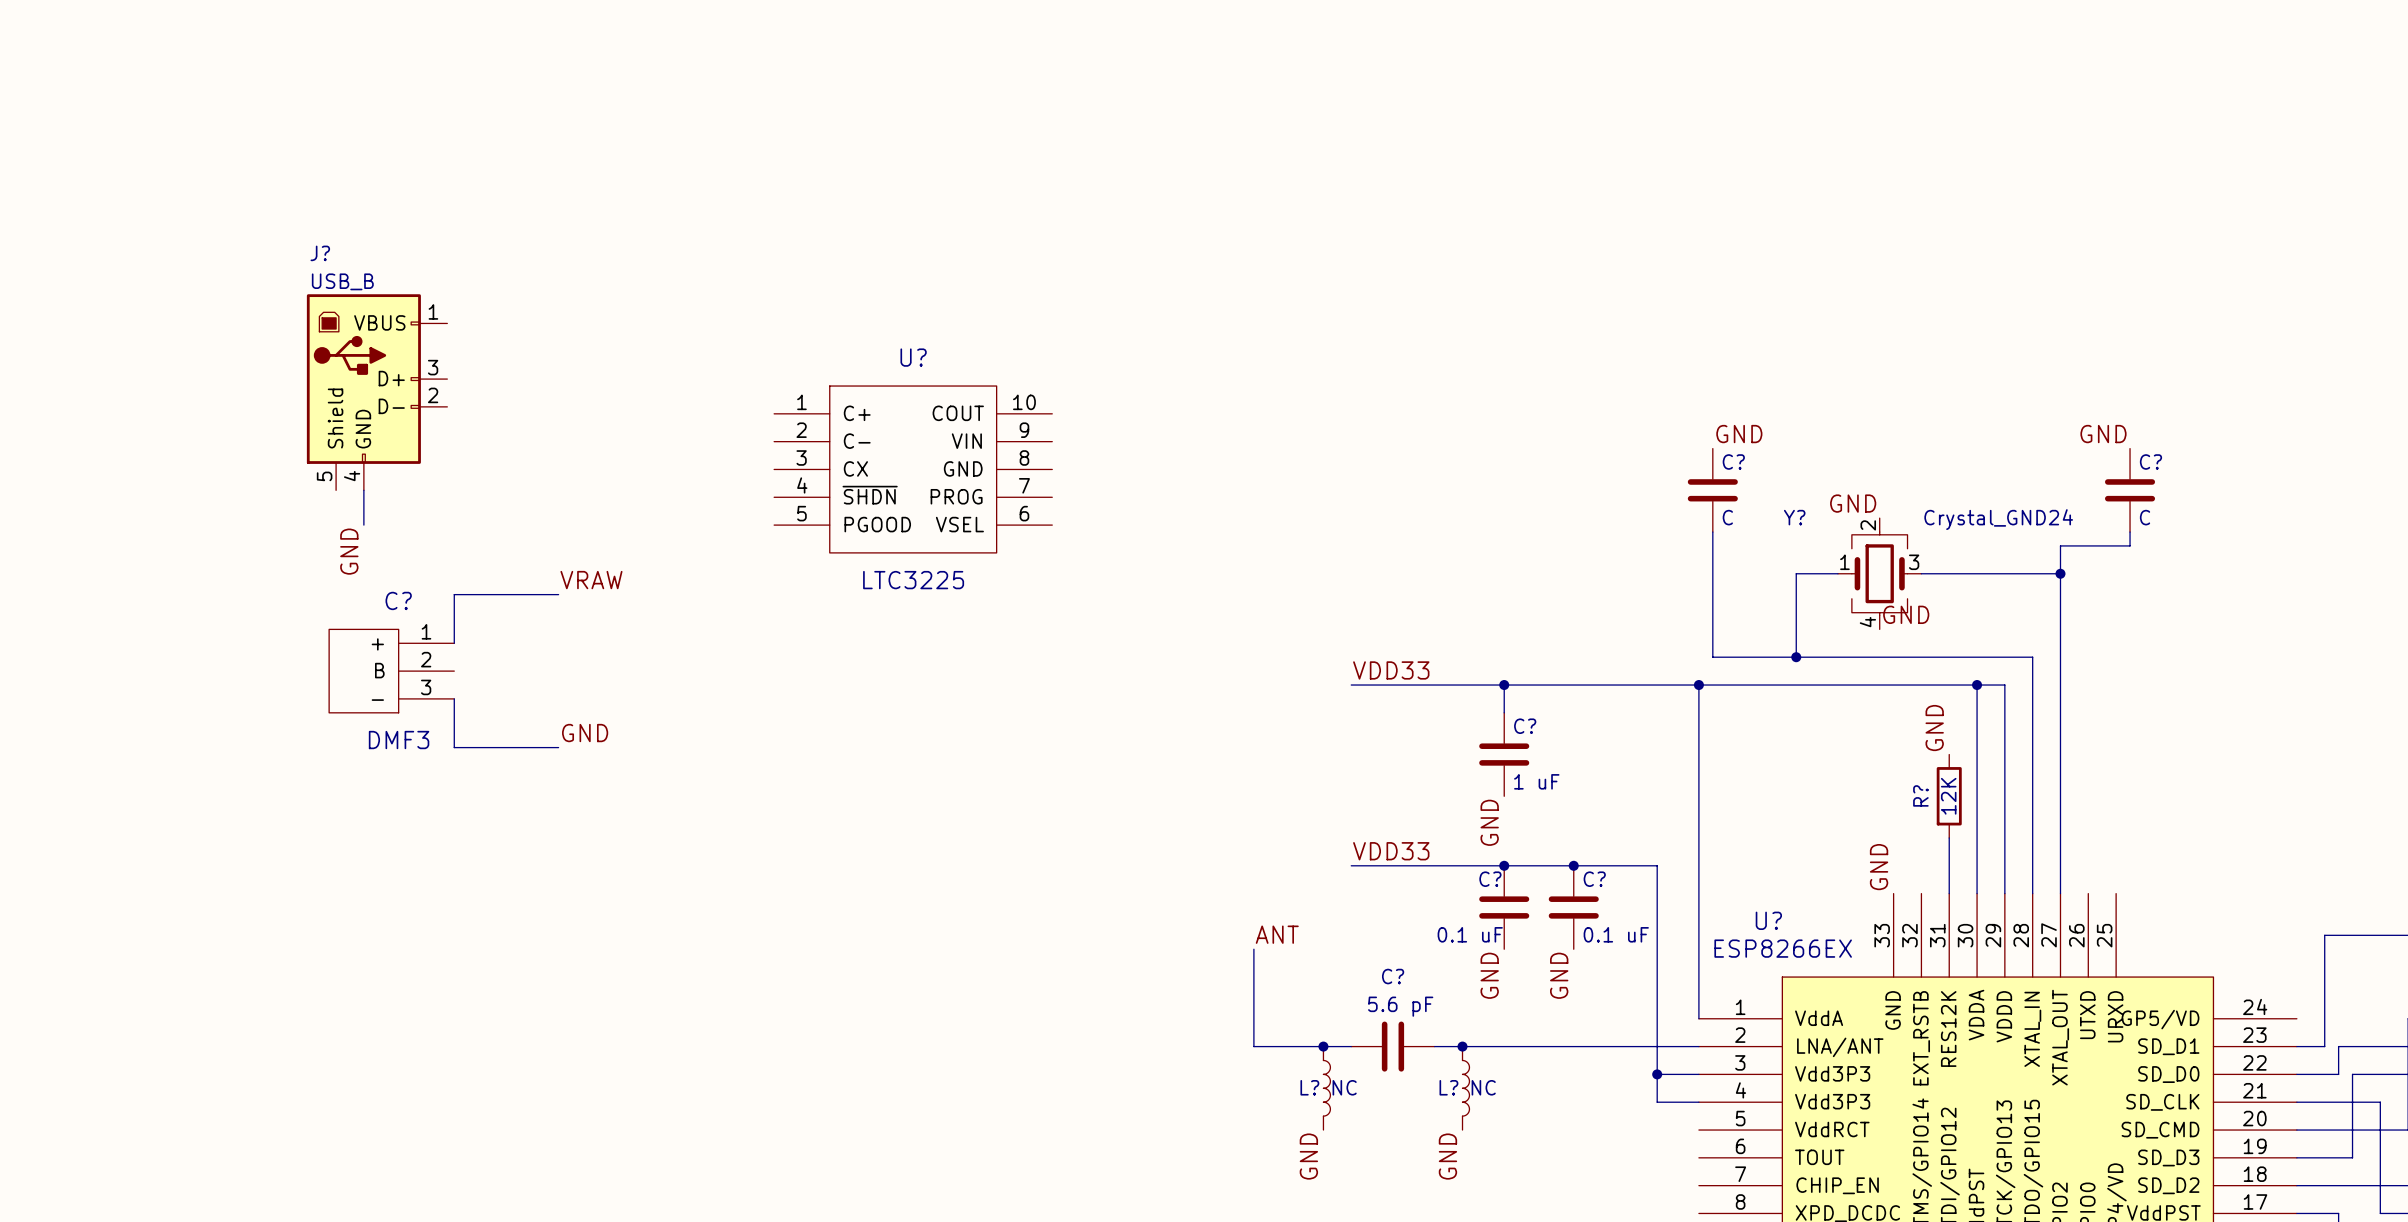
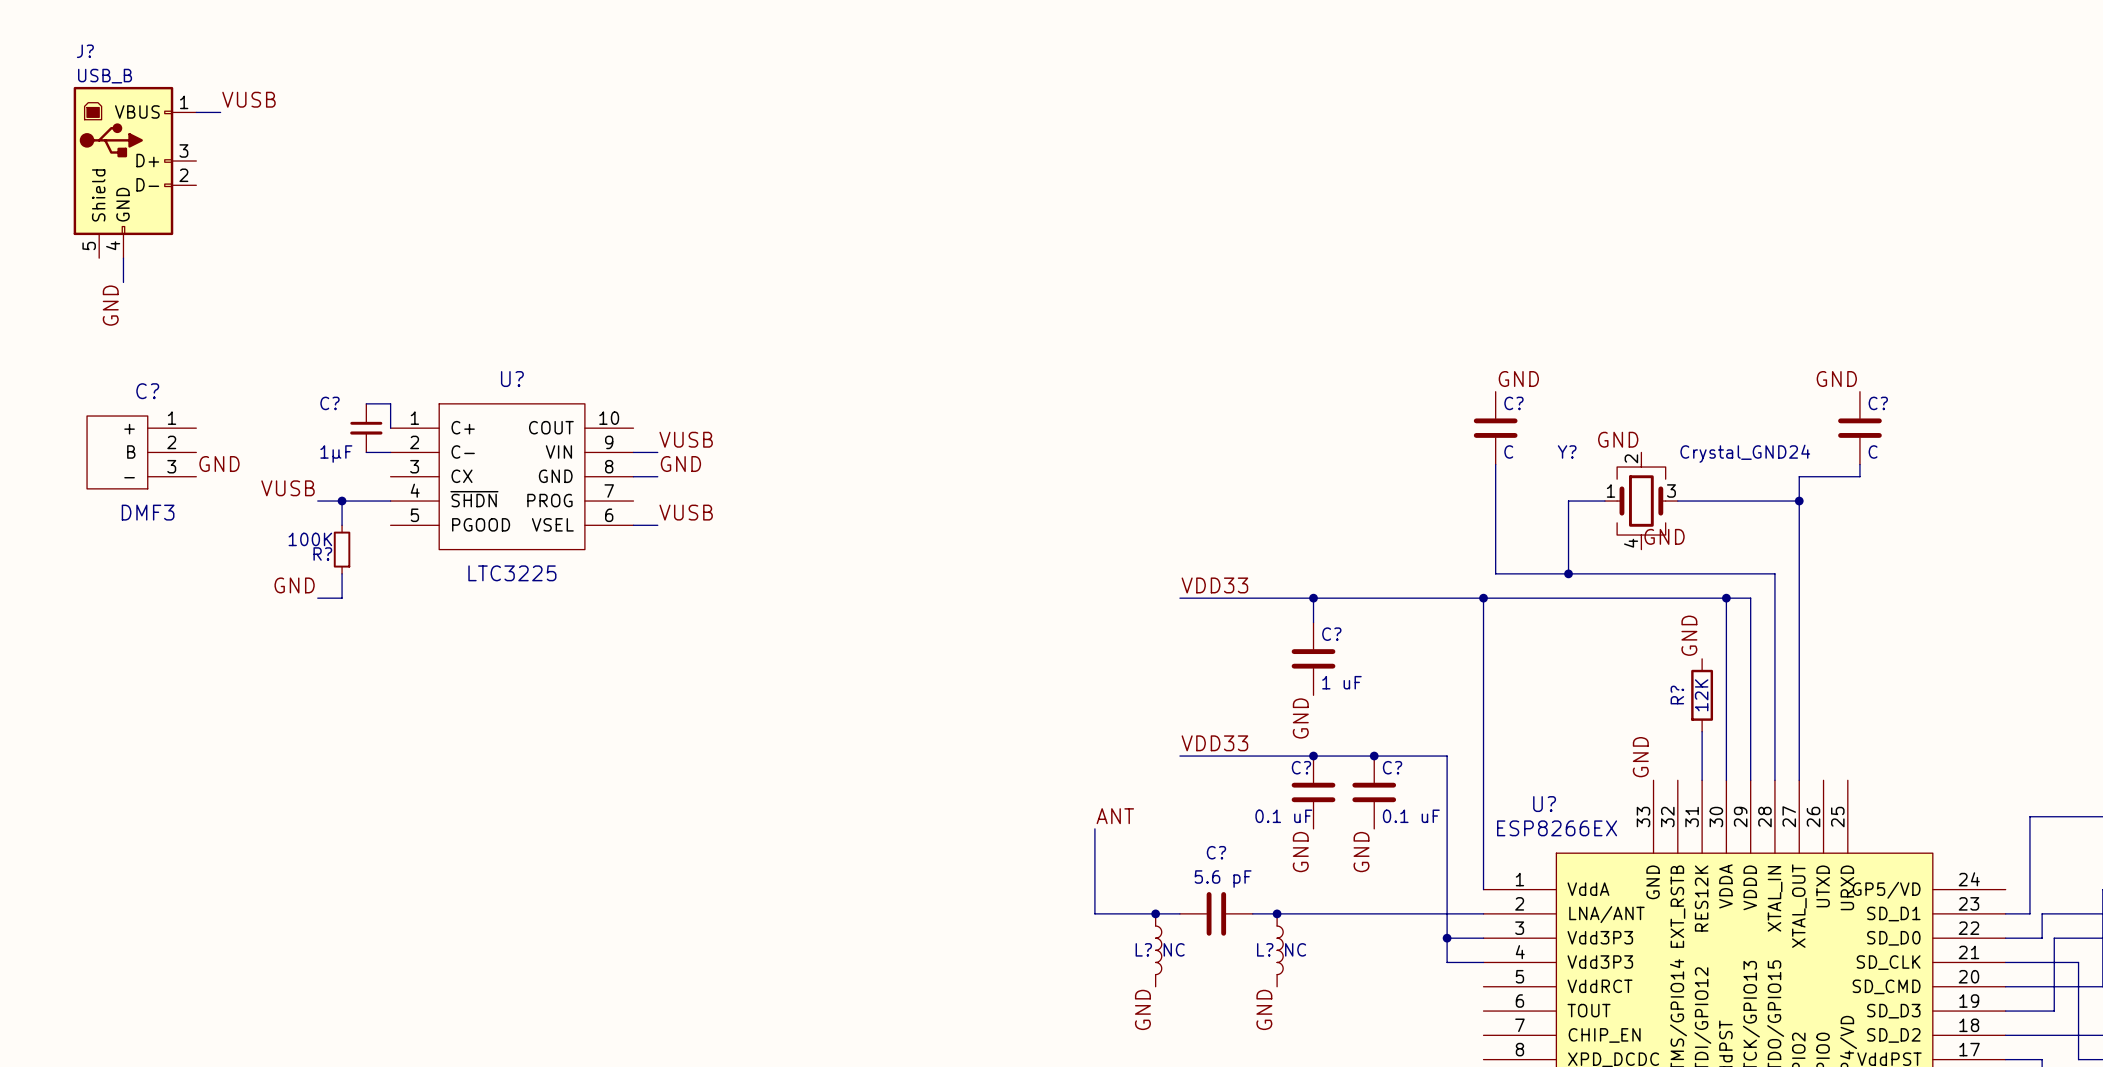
label: none -> VUSB (248, 99)
wire: none -> (196, 112) (220, 112)
J?: none -> USB_B (135, 172)
wire: none -> (123, 258) (123, 282)
label: none -> GND (110, 305)
J?: USB_B (377, 392) -> none
wire: none -> (366, 403) (390, 403) (390, 428)
U?: LTC3225 (913, 469) -> none
wire: (363, 490) (363, 525) -> none
C?: none -> 1μF (366, 428)
label: none -> VUSB (686, 439)
C?: none -> DMF3 (141, 452)
wire: none -> (366, 452) (390, 452)
wire: none -> (633, 452) (657, 452)
label: none -> GND (219, 464)
label: none -> GND (680, 464)
U?: none -> LTC3225 (512, 476)
wire: none -> (633, 476) (657, 476)
label: GND (349, 551) -> none
label: none -> VUSB (288, 488)
wire: none -> (317, 501) (390, 501)
wire: none -> (342, 501) (342, 525)
junction: none -> (342, 501)
label: VRAW (591, 580) -> none
label: none -> VUSB (686, 512)
wire: (558, 594) (454, 594) (454, 643) -> none
wire: none -> (633, 525) (657, 525)
R?: none -> 100K (342, 549)
wire: none -> (342, 573) (342, 598) (317, 598)
label: none -> GND (294, 585)
C?: DMF3 (391, 671) -> none
wire: (454, 698) (454, 747) (558, 747) -> none
label: GND (585, 733) -> none

